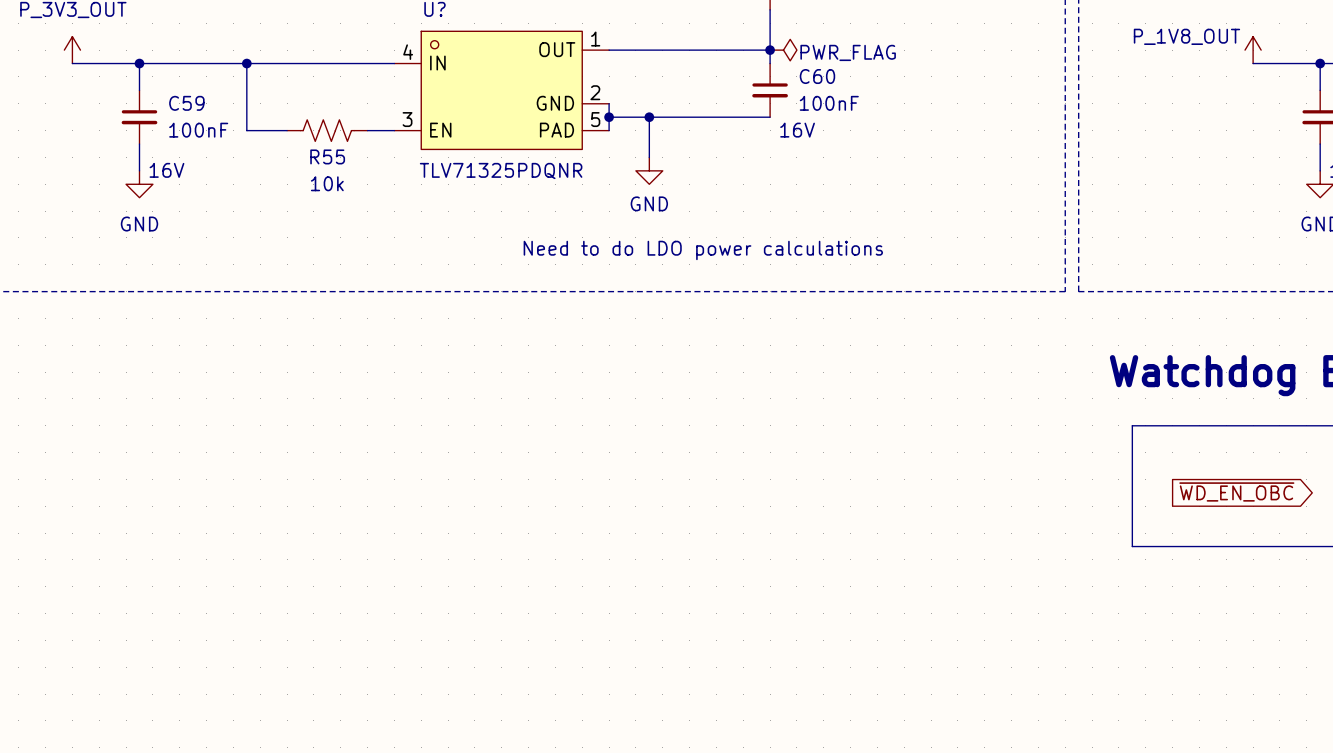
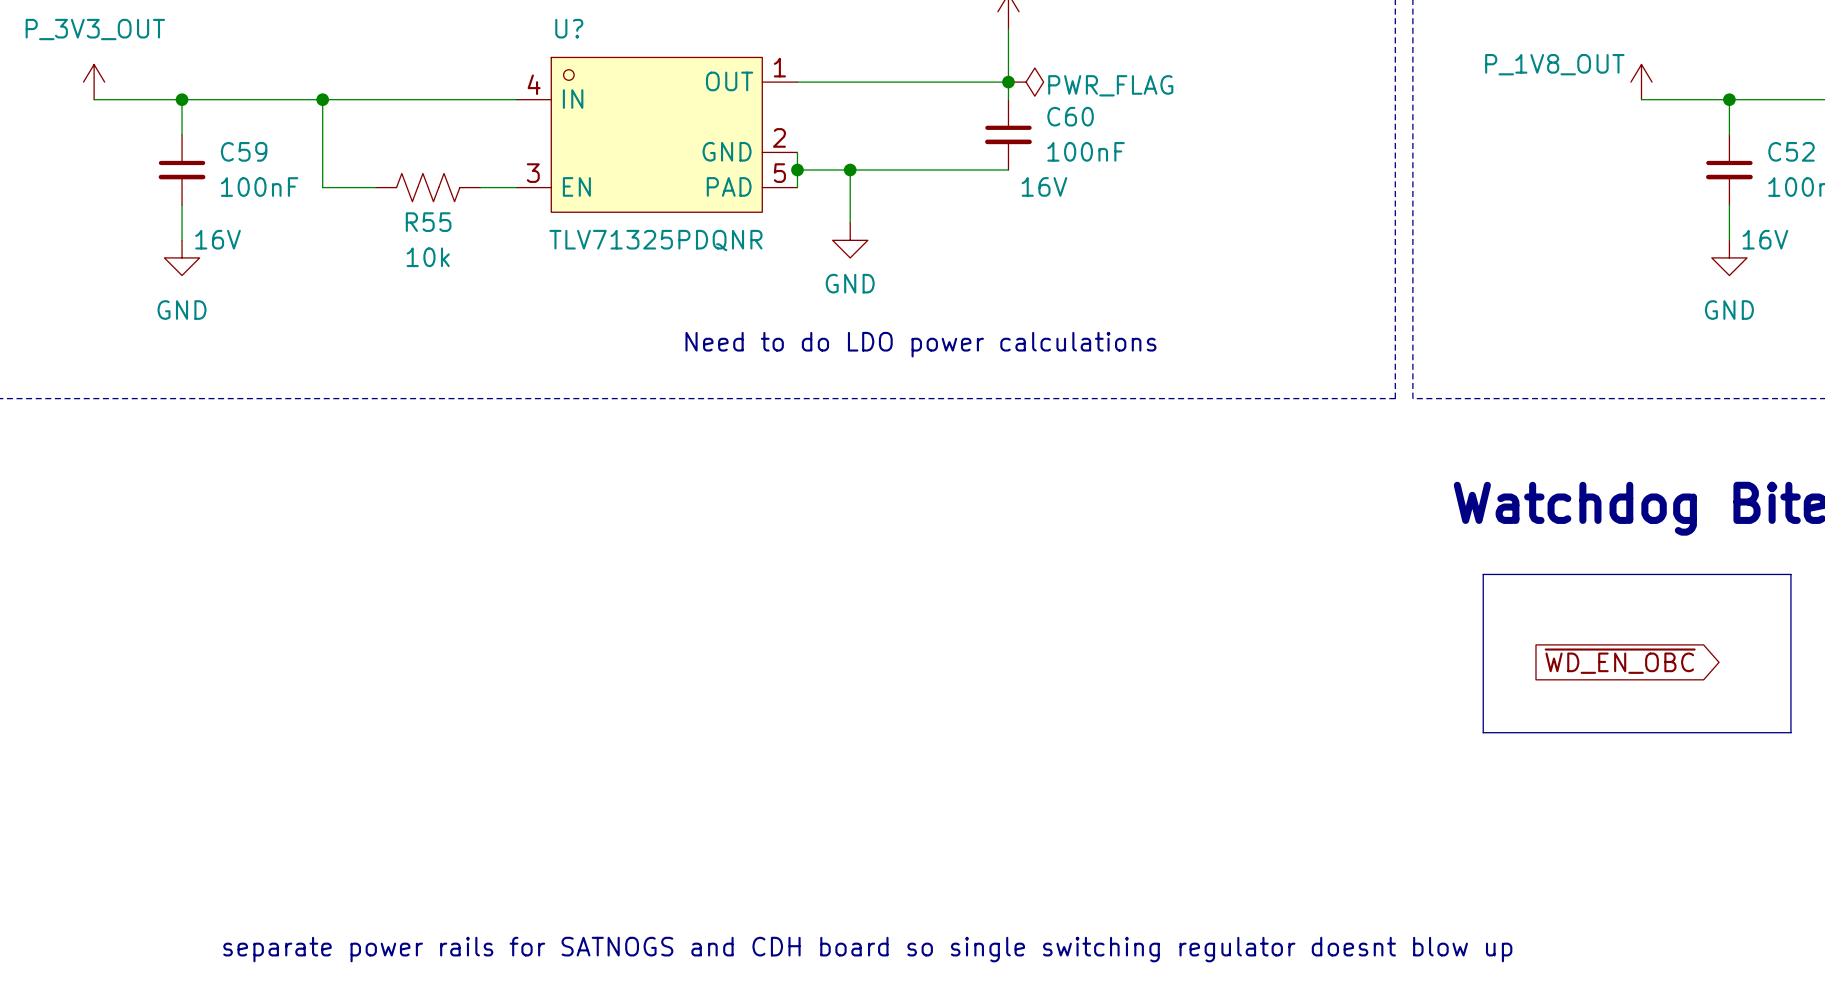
text: none -> separate power rails for SATNOGS and CDH board so single switching regulator doesnt blow up (867, 949)

